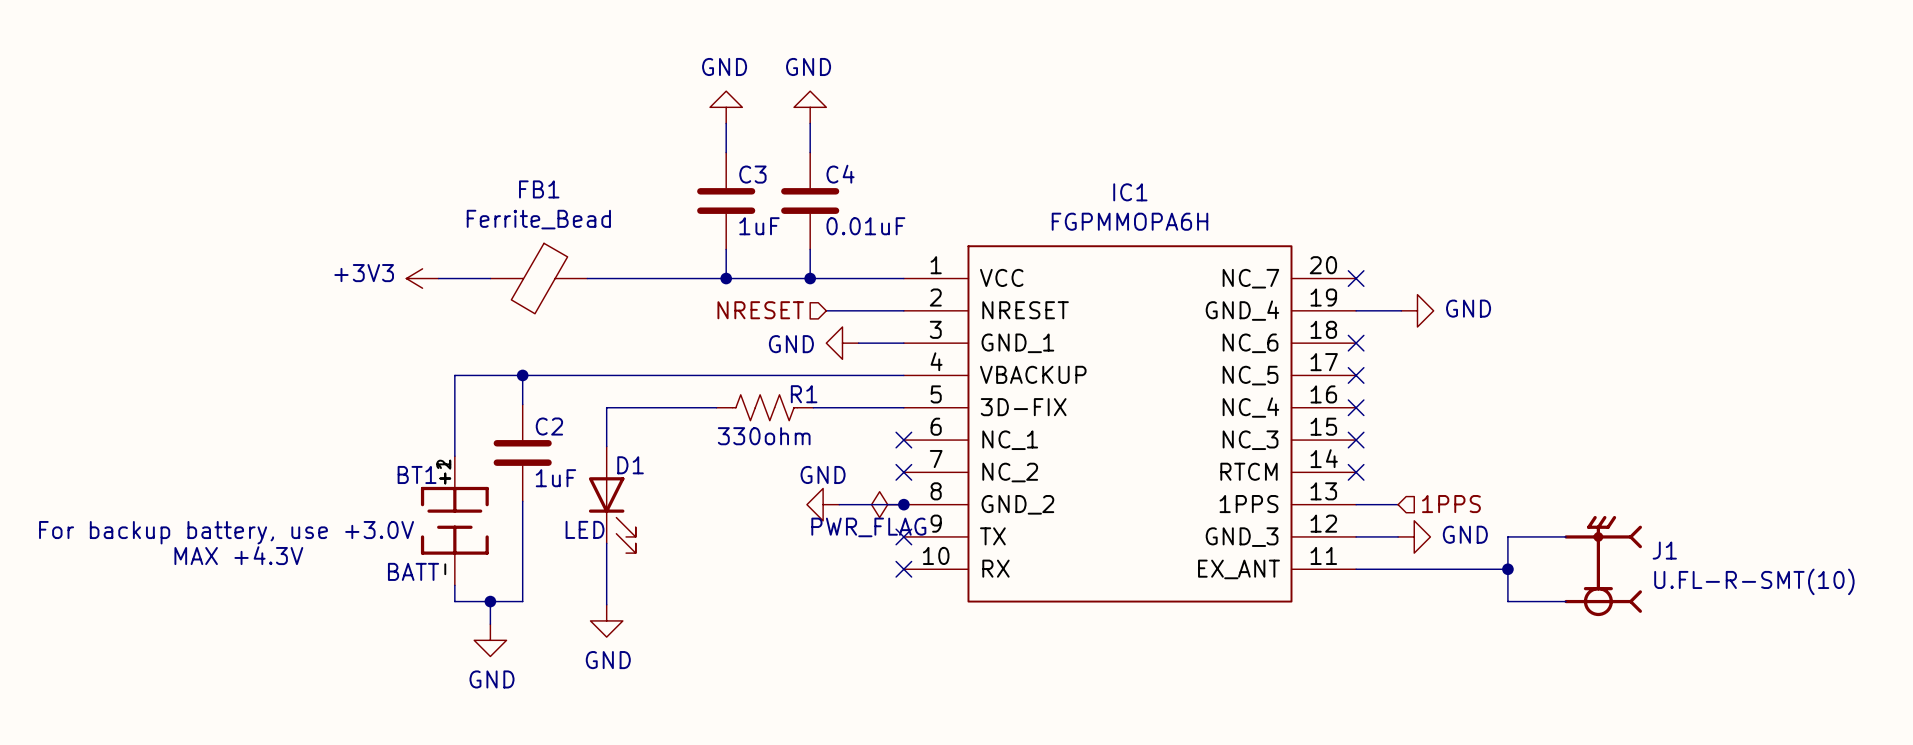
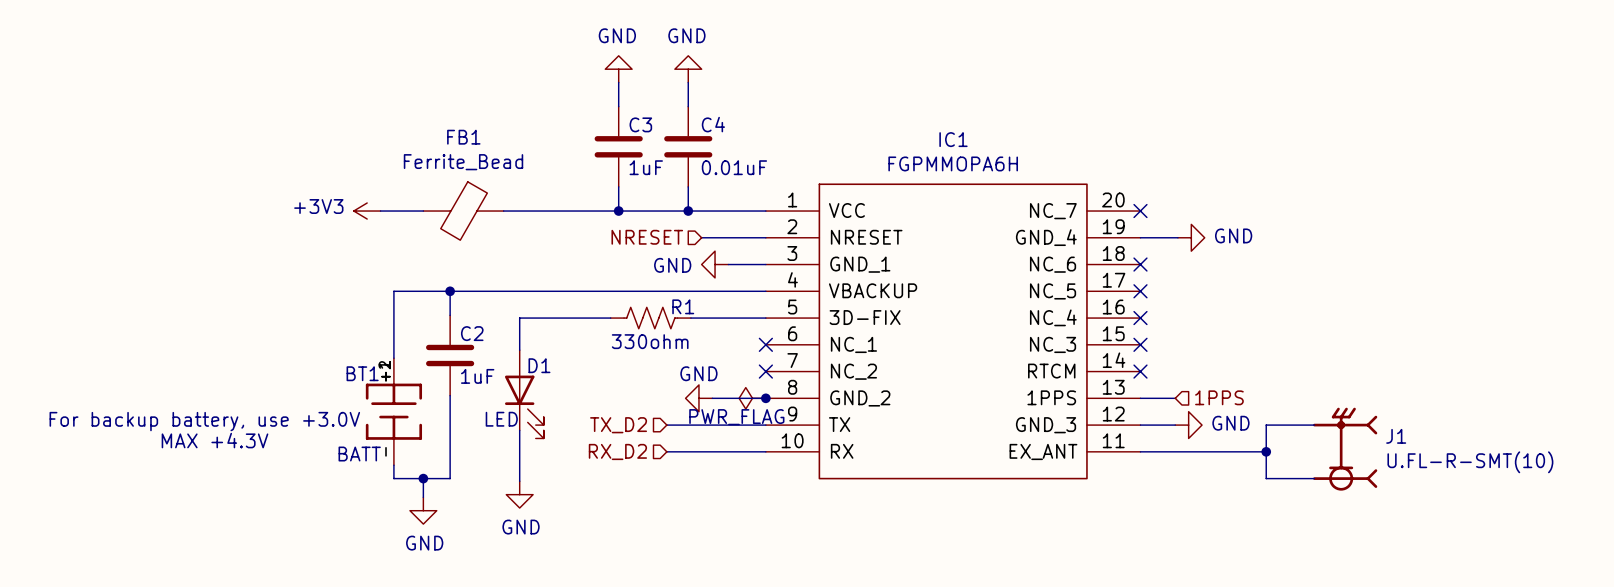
wire: none -> (666, 425) (765, 425)
no-connect mark: (903, 536) -> none
hierarchical label: none -> TX_D2 (618, 425)
hierarchical label: none -> RX_D2 (617, 451)
wire: none -> (666, 451) (765, 451)
no-connect mark: (903, 569) -> none

